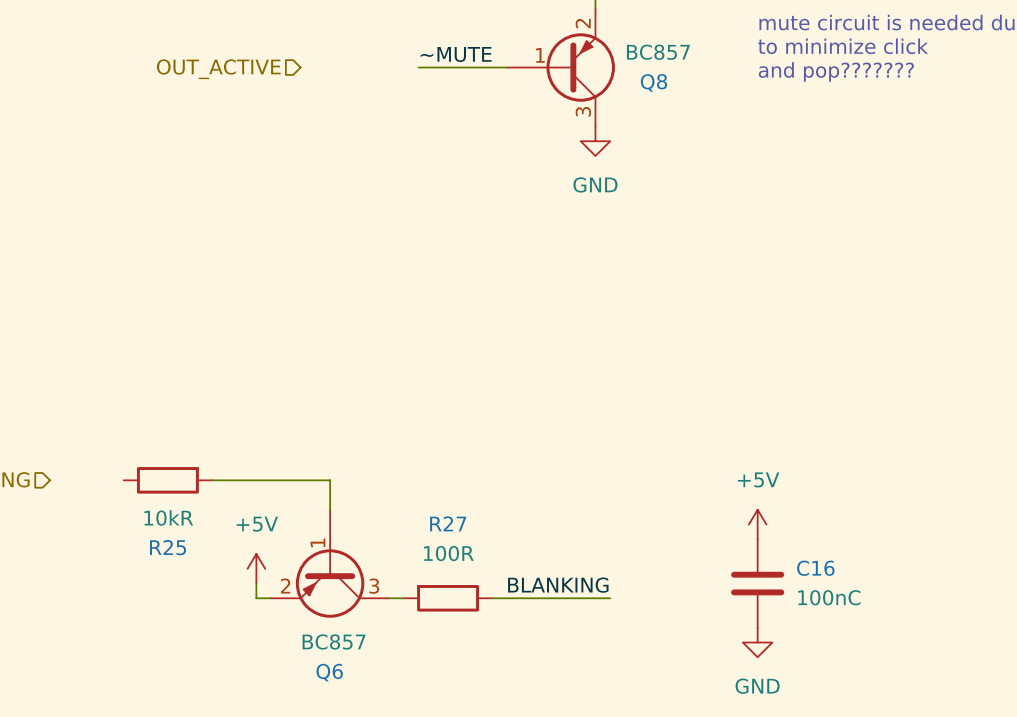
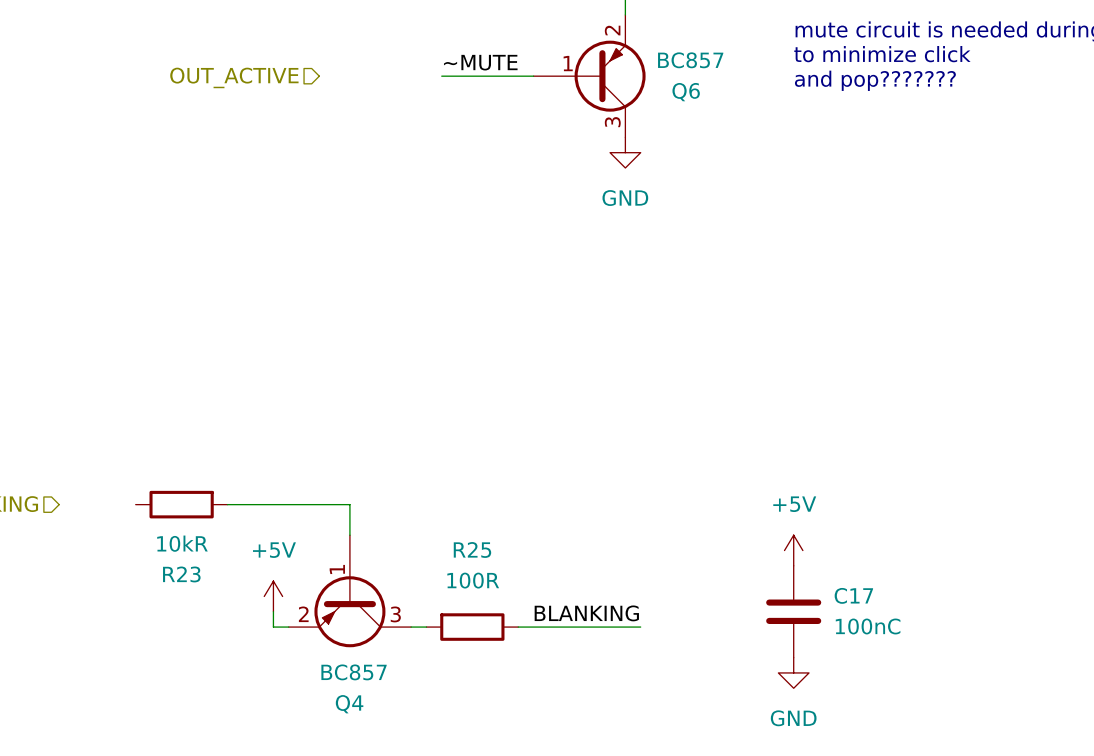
Q8 name: Q8 (653, 82) -> Q6 (686, 92)
R27 name: R27 (448, 523) -> R25 (472, 549)
R25 name: R25 (168, 547) -> R23 (181, 574)
C16 name: C16 (815, 568) -> C17 (853, 595)
Q6 name: Q6 (329, 672) -> Q4 (349, 704)

